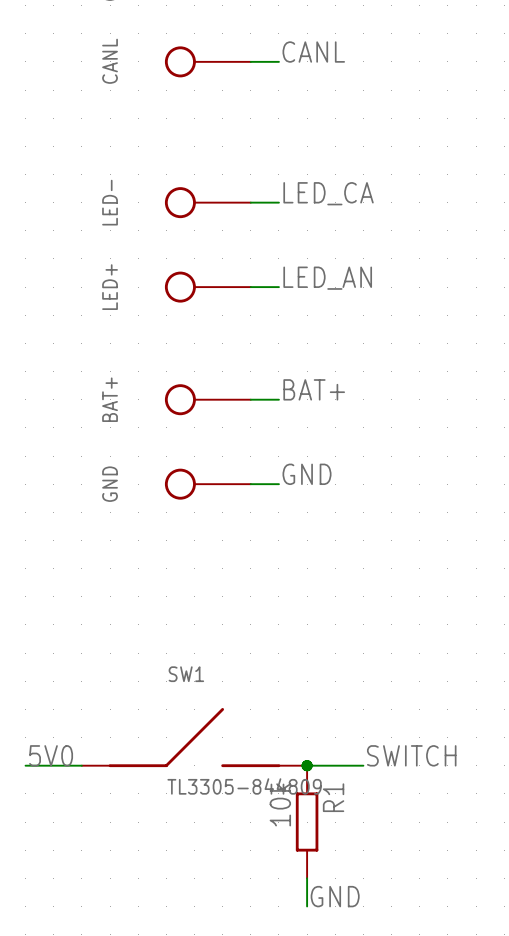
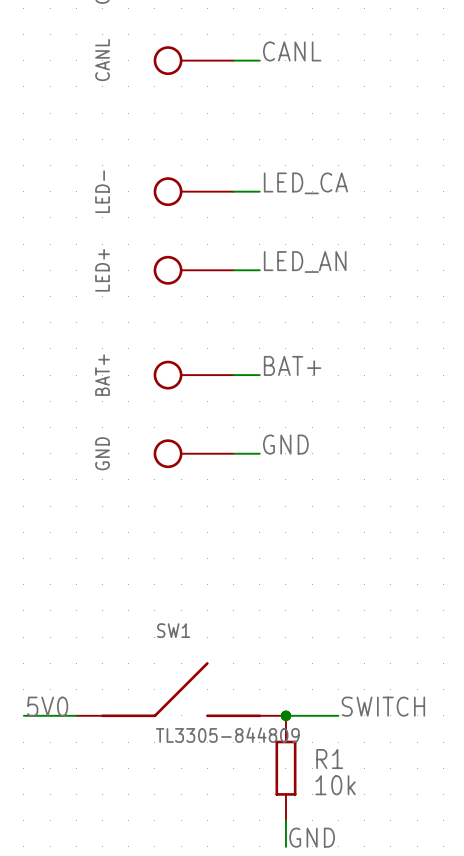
R1 name rotation: 0° (333, 797) -> 90° clockwise (329, 759)
R1 value rotation: 0° (280, 804) -> 90° clockwise (335, 785)
R1 value position: 10k (280, 804) -> 10k (335, 785)

